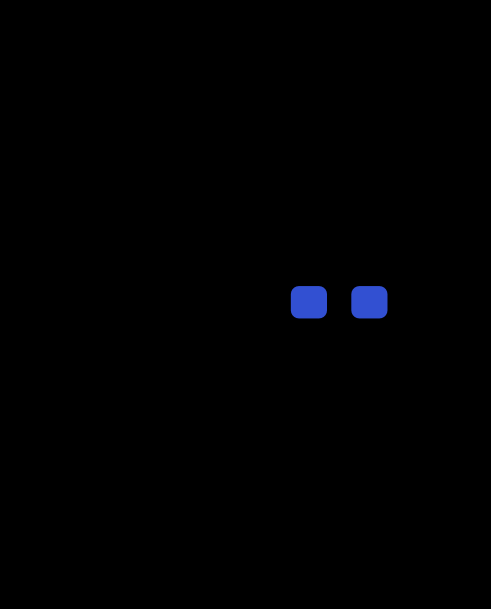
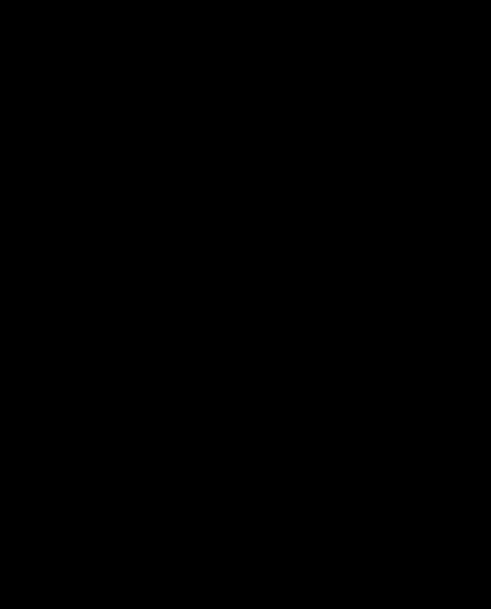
part: (339, 302) -> none

